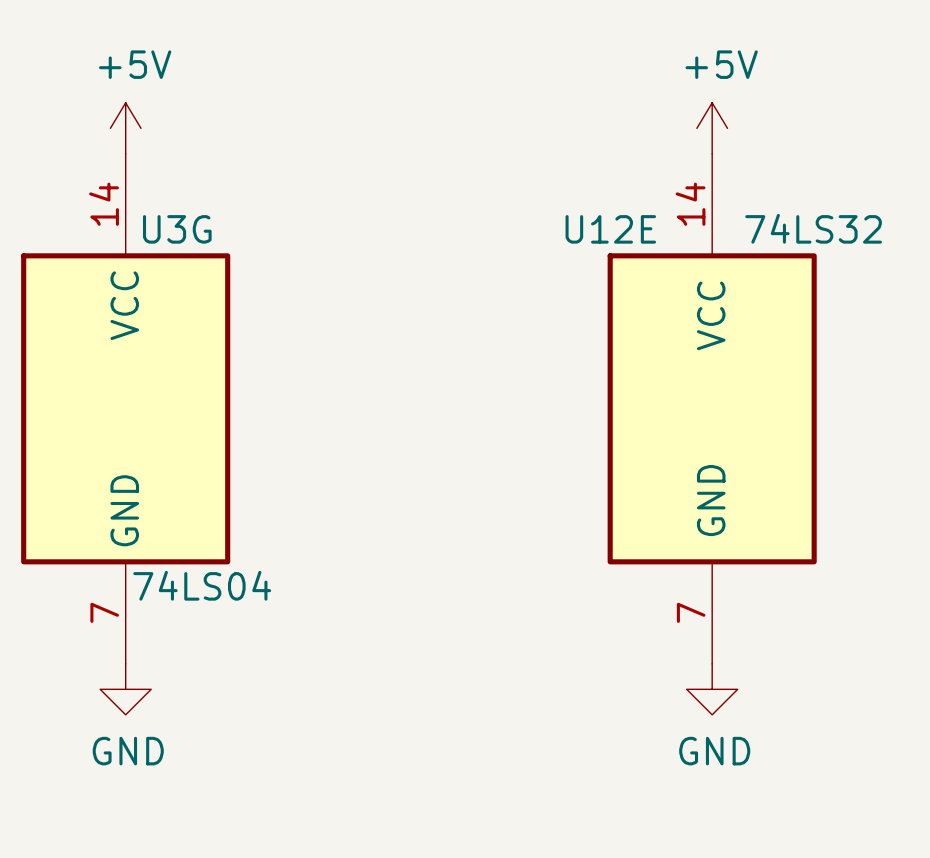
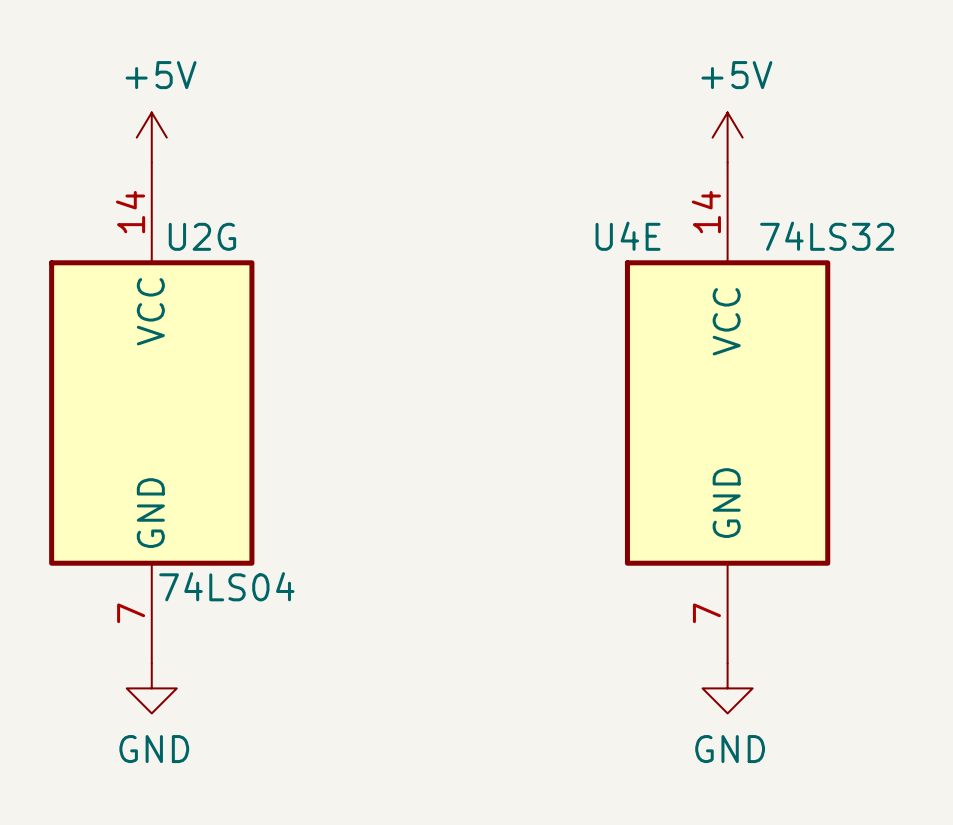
U3G name: U3G (177, 229) -> U2G (202, 236)
U12E name: U12E (610, 229) -> U4E (628, 236)

